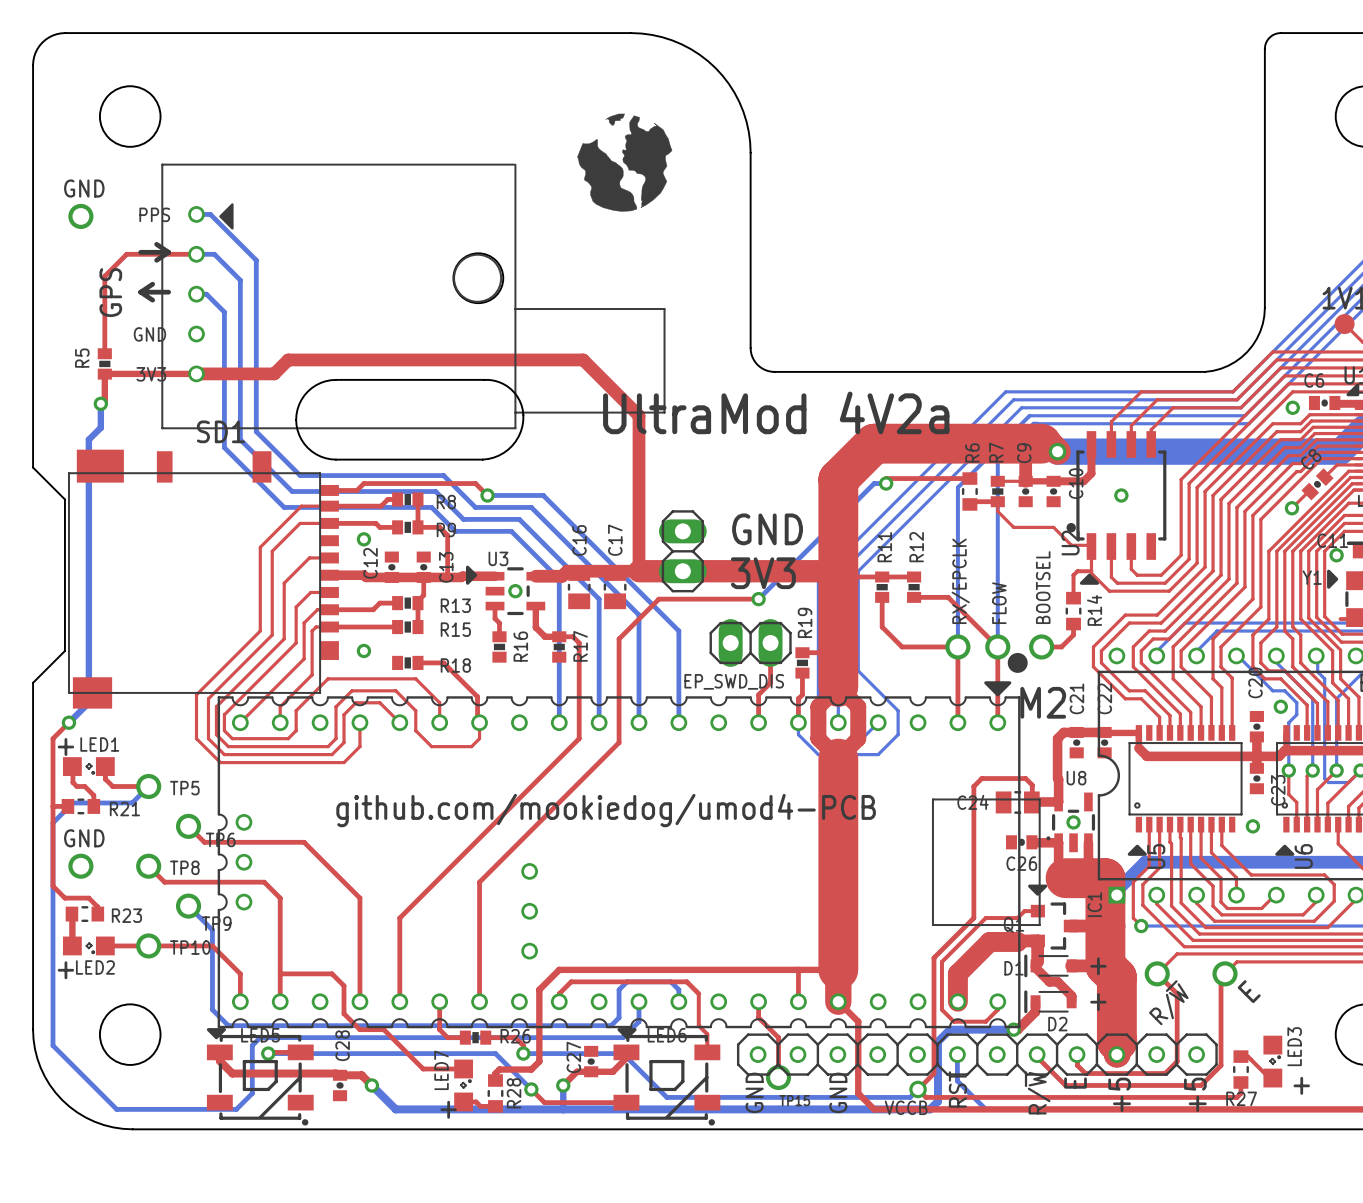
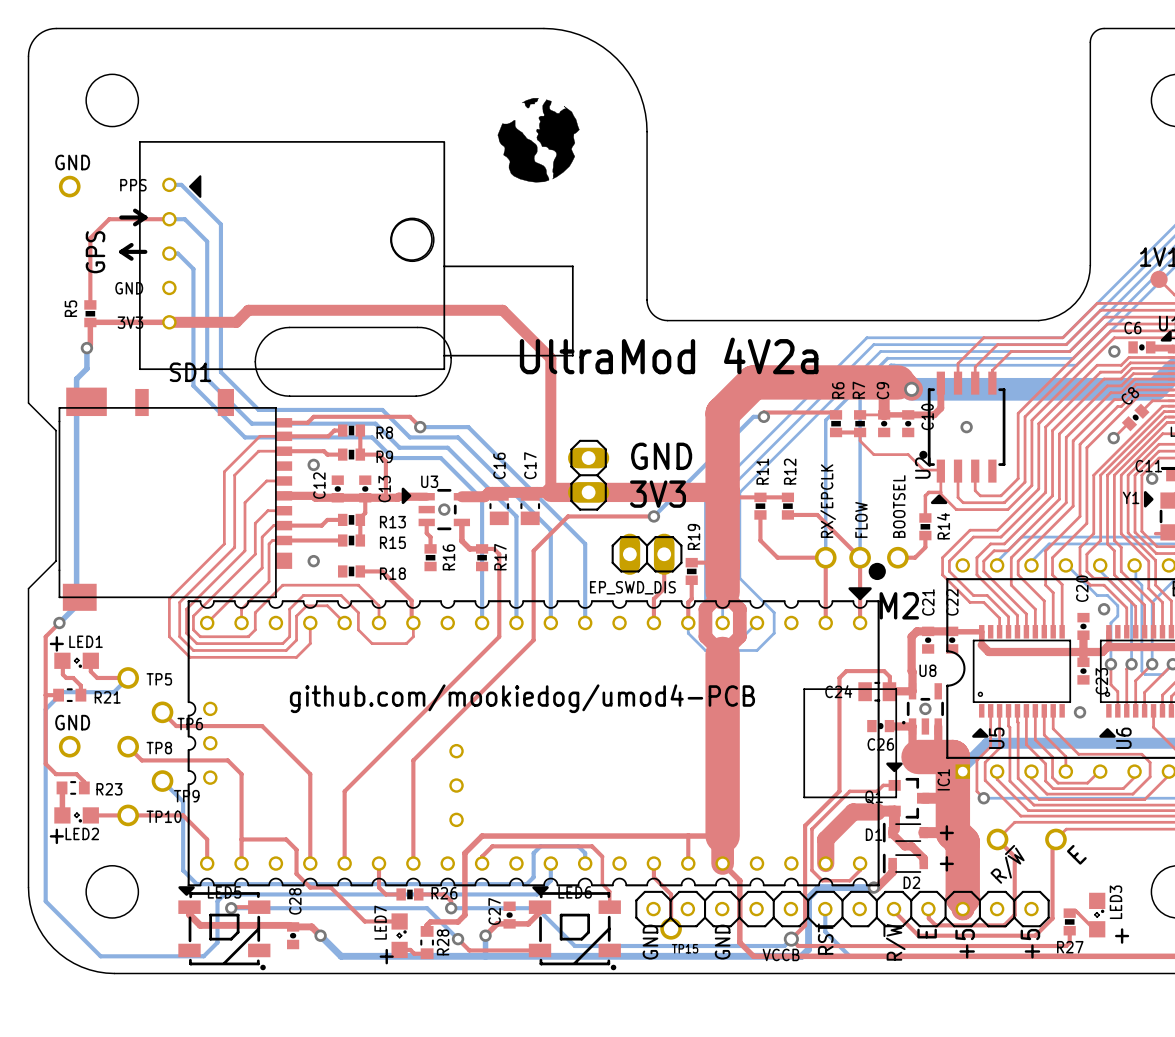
R6 footprint: [961, 472, 978, 511] -> [829, 410, 843, 438]
R14 footprint: [1065, 591, 1082, 631] -> [919, 513, 932, 541]
R27 footprint: [1233, 1050, 1249, 1089] -> [1063, 908, 1076, 936]

